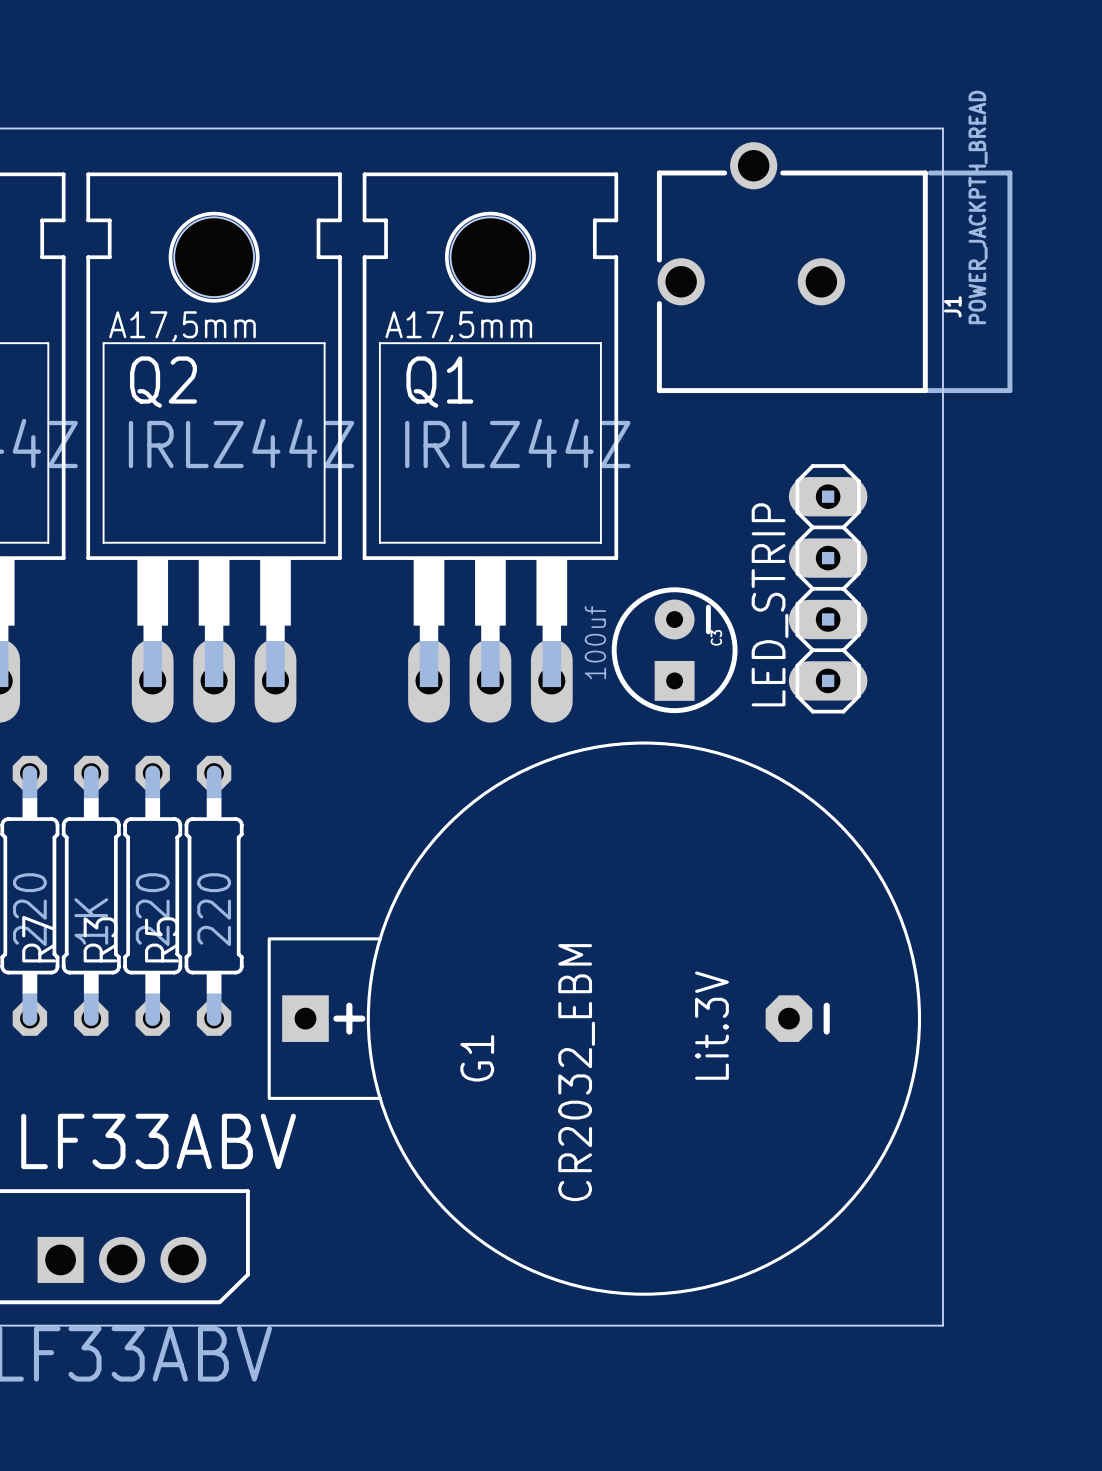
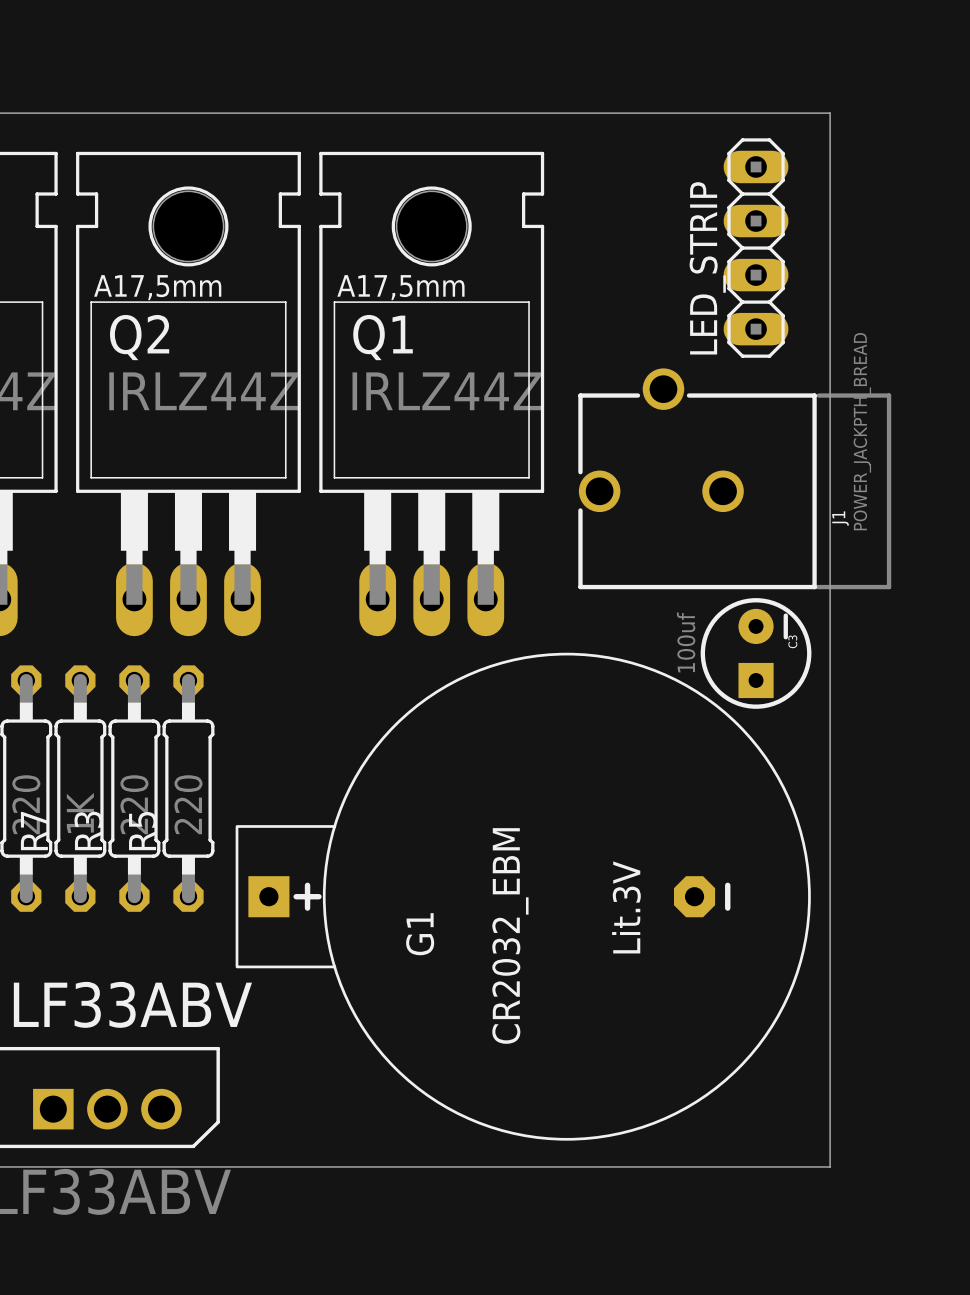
J1 position: (834, 267) -> (734, 478)
LED_STRIP: none -> (756, 248)
LED_STRIP: (828, 588) -> none
C3 position: (674, 650) -> (756, 653)

